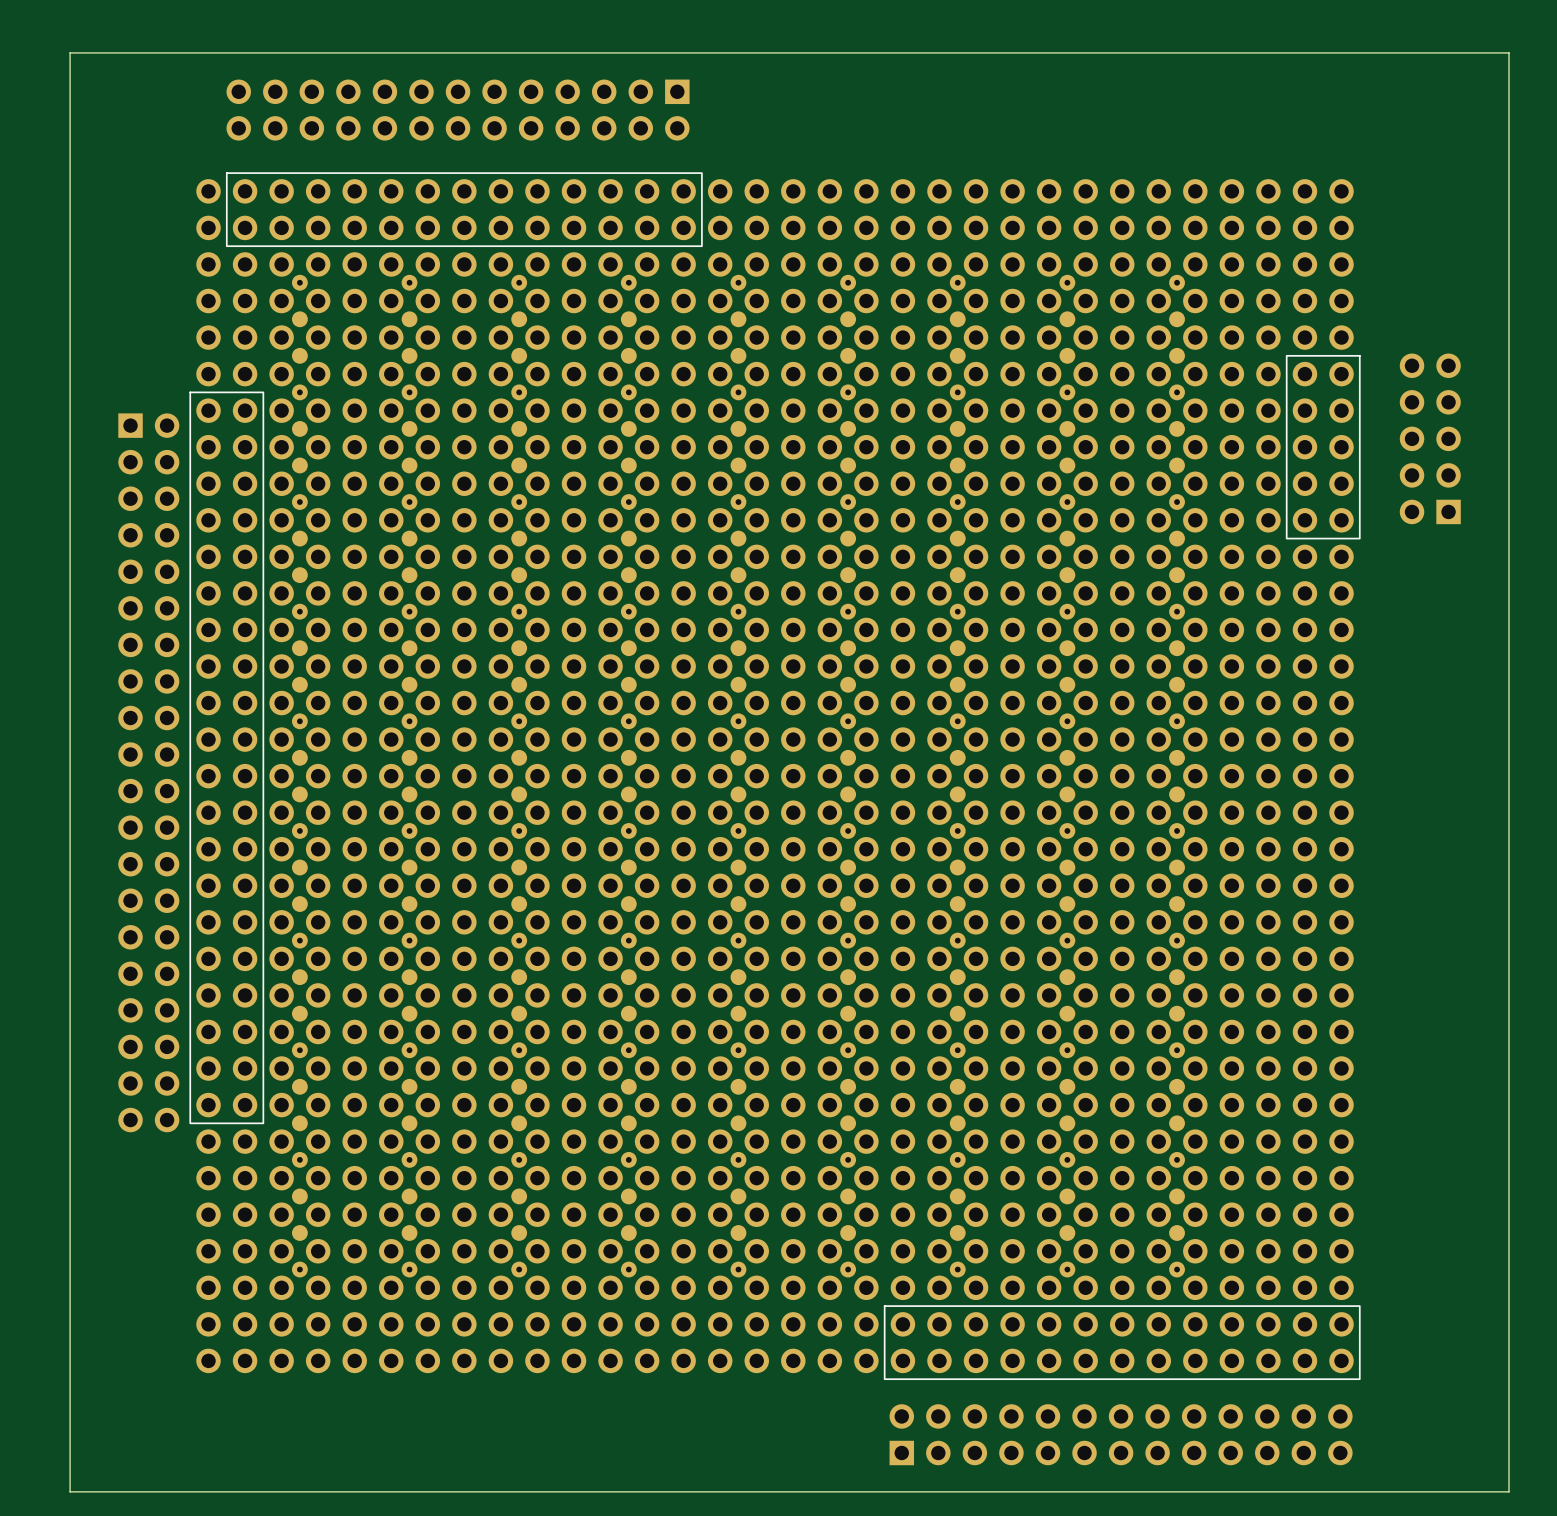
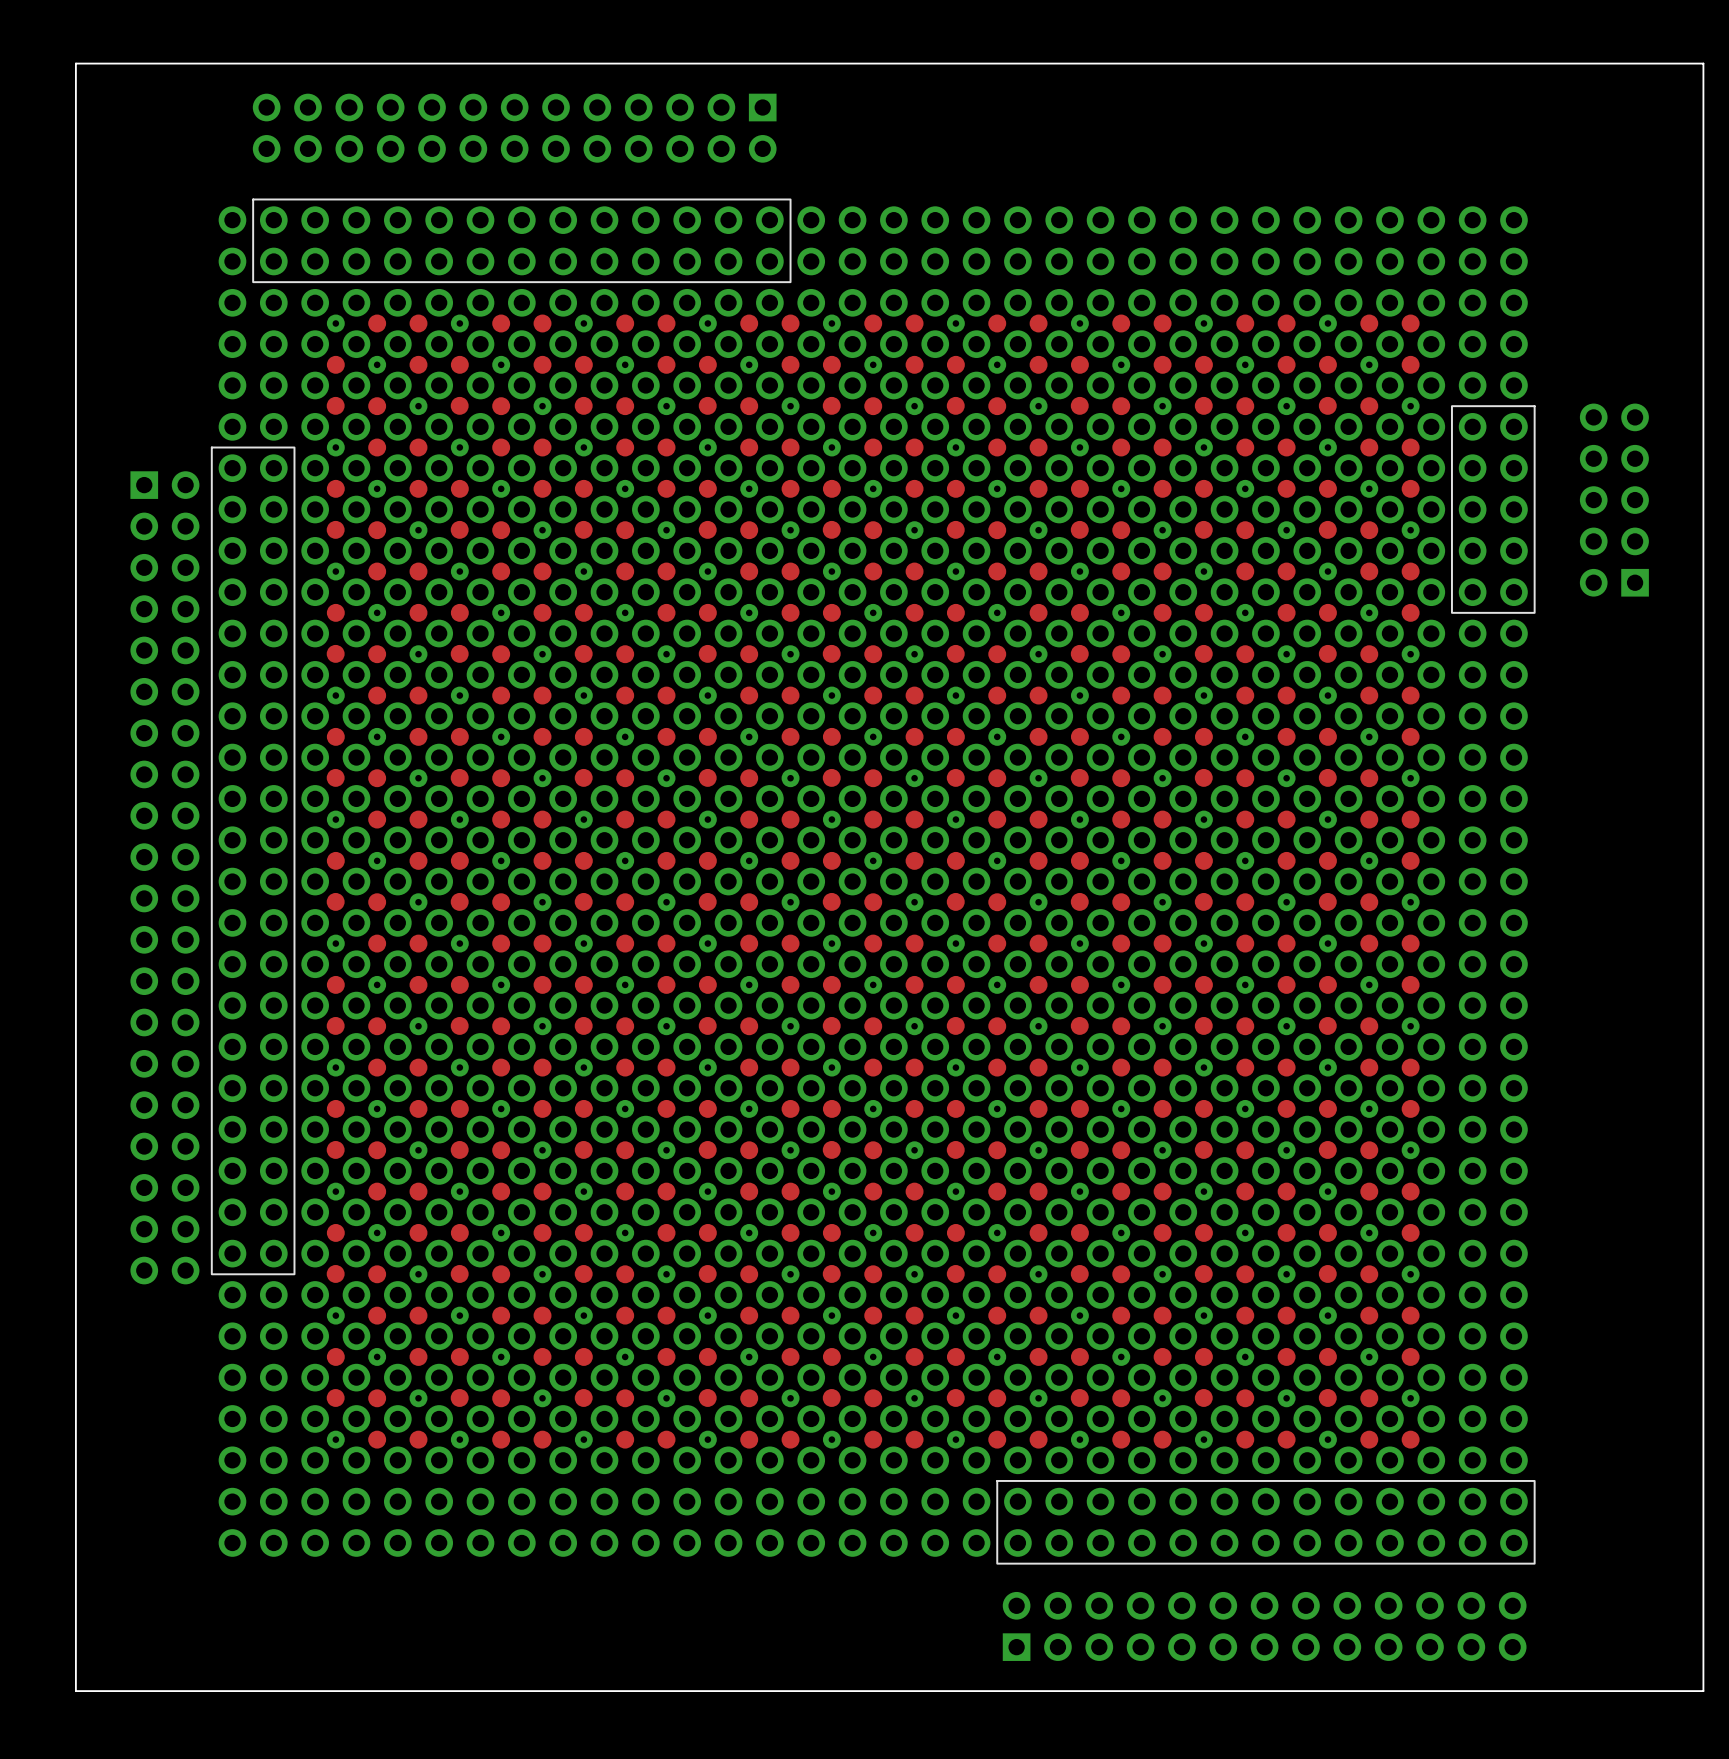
part footprint: [189, 172, 1361, 1381] -> [210, 198, 1536, 1565]

